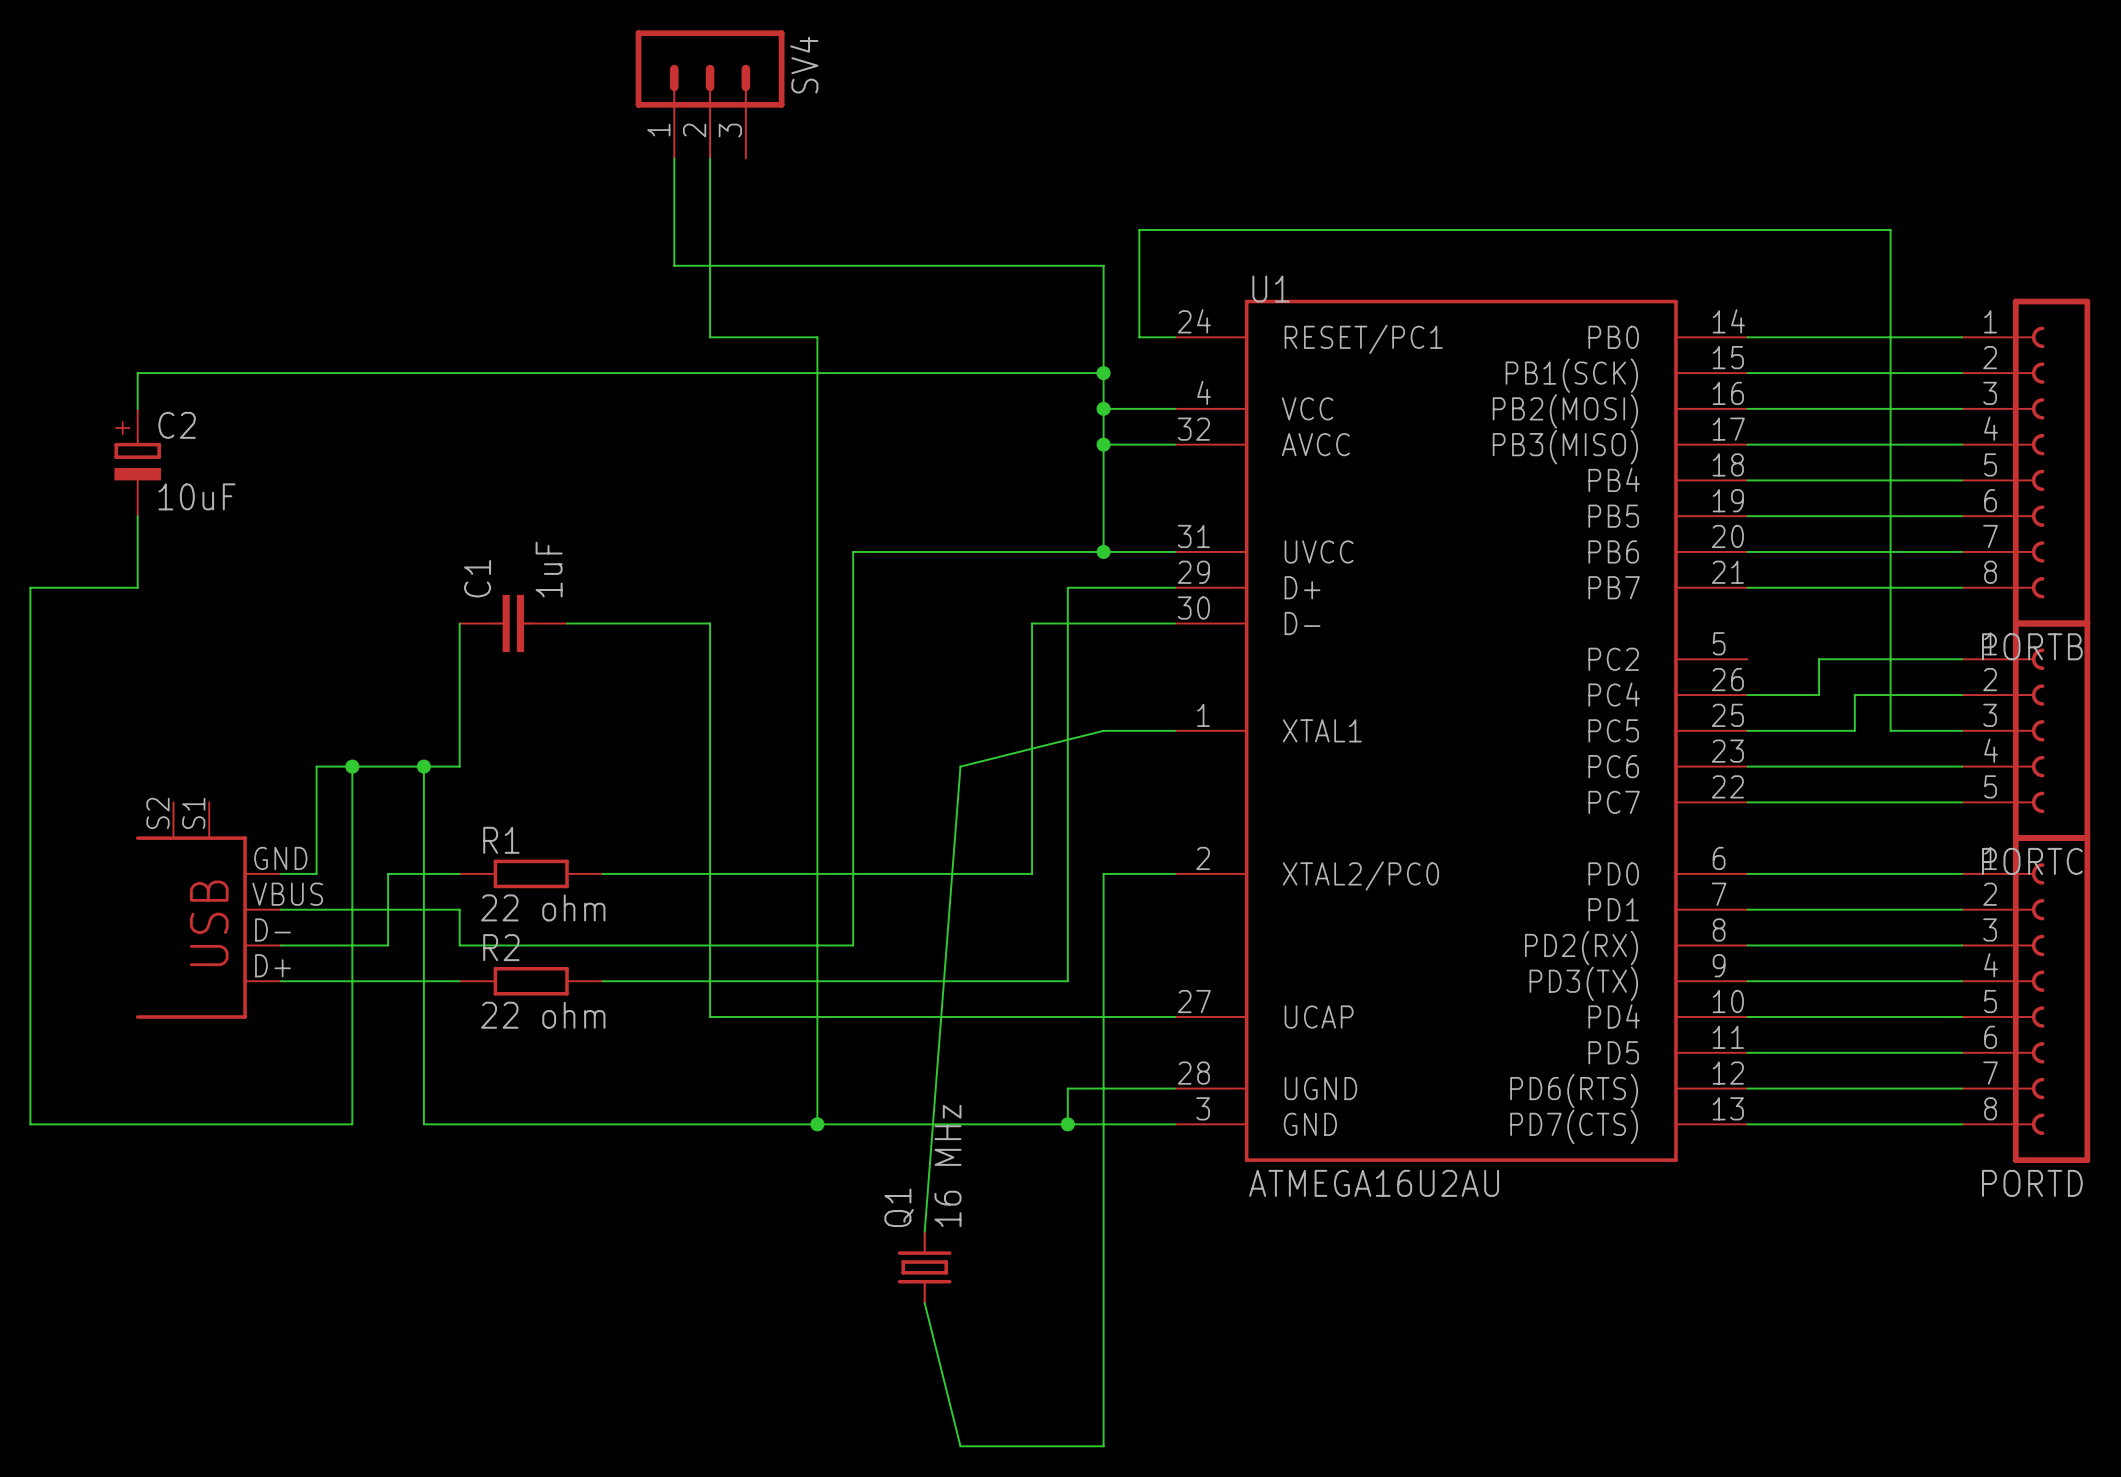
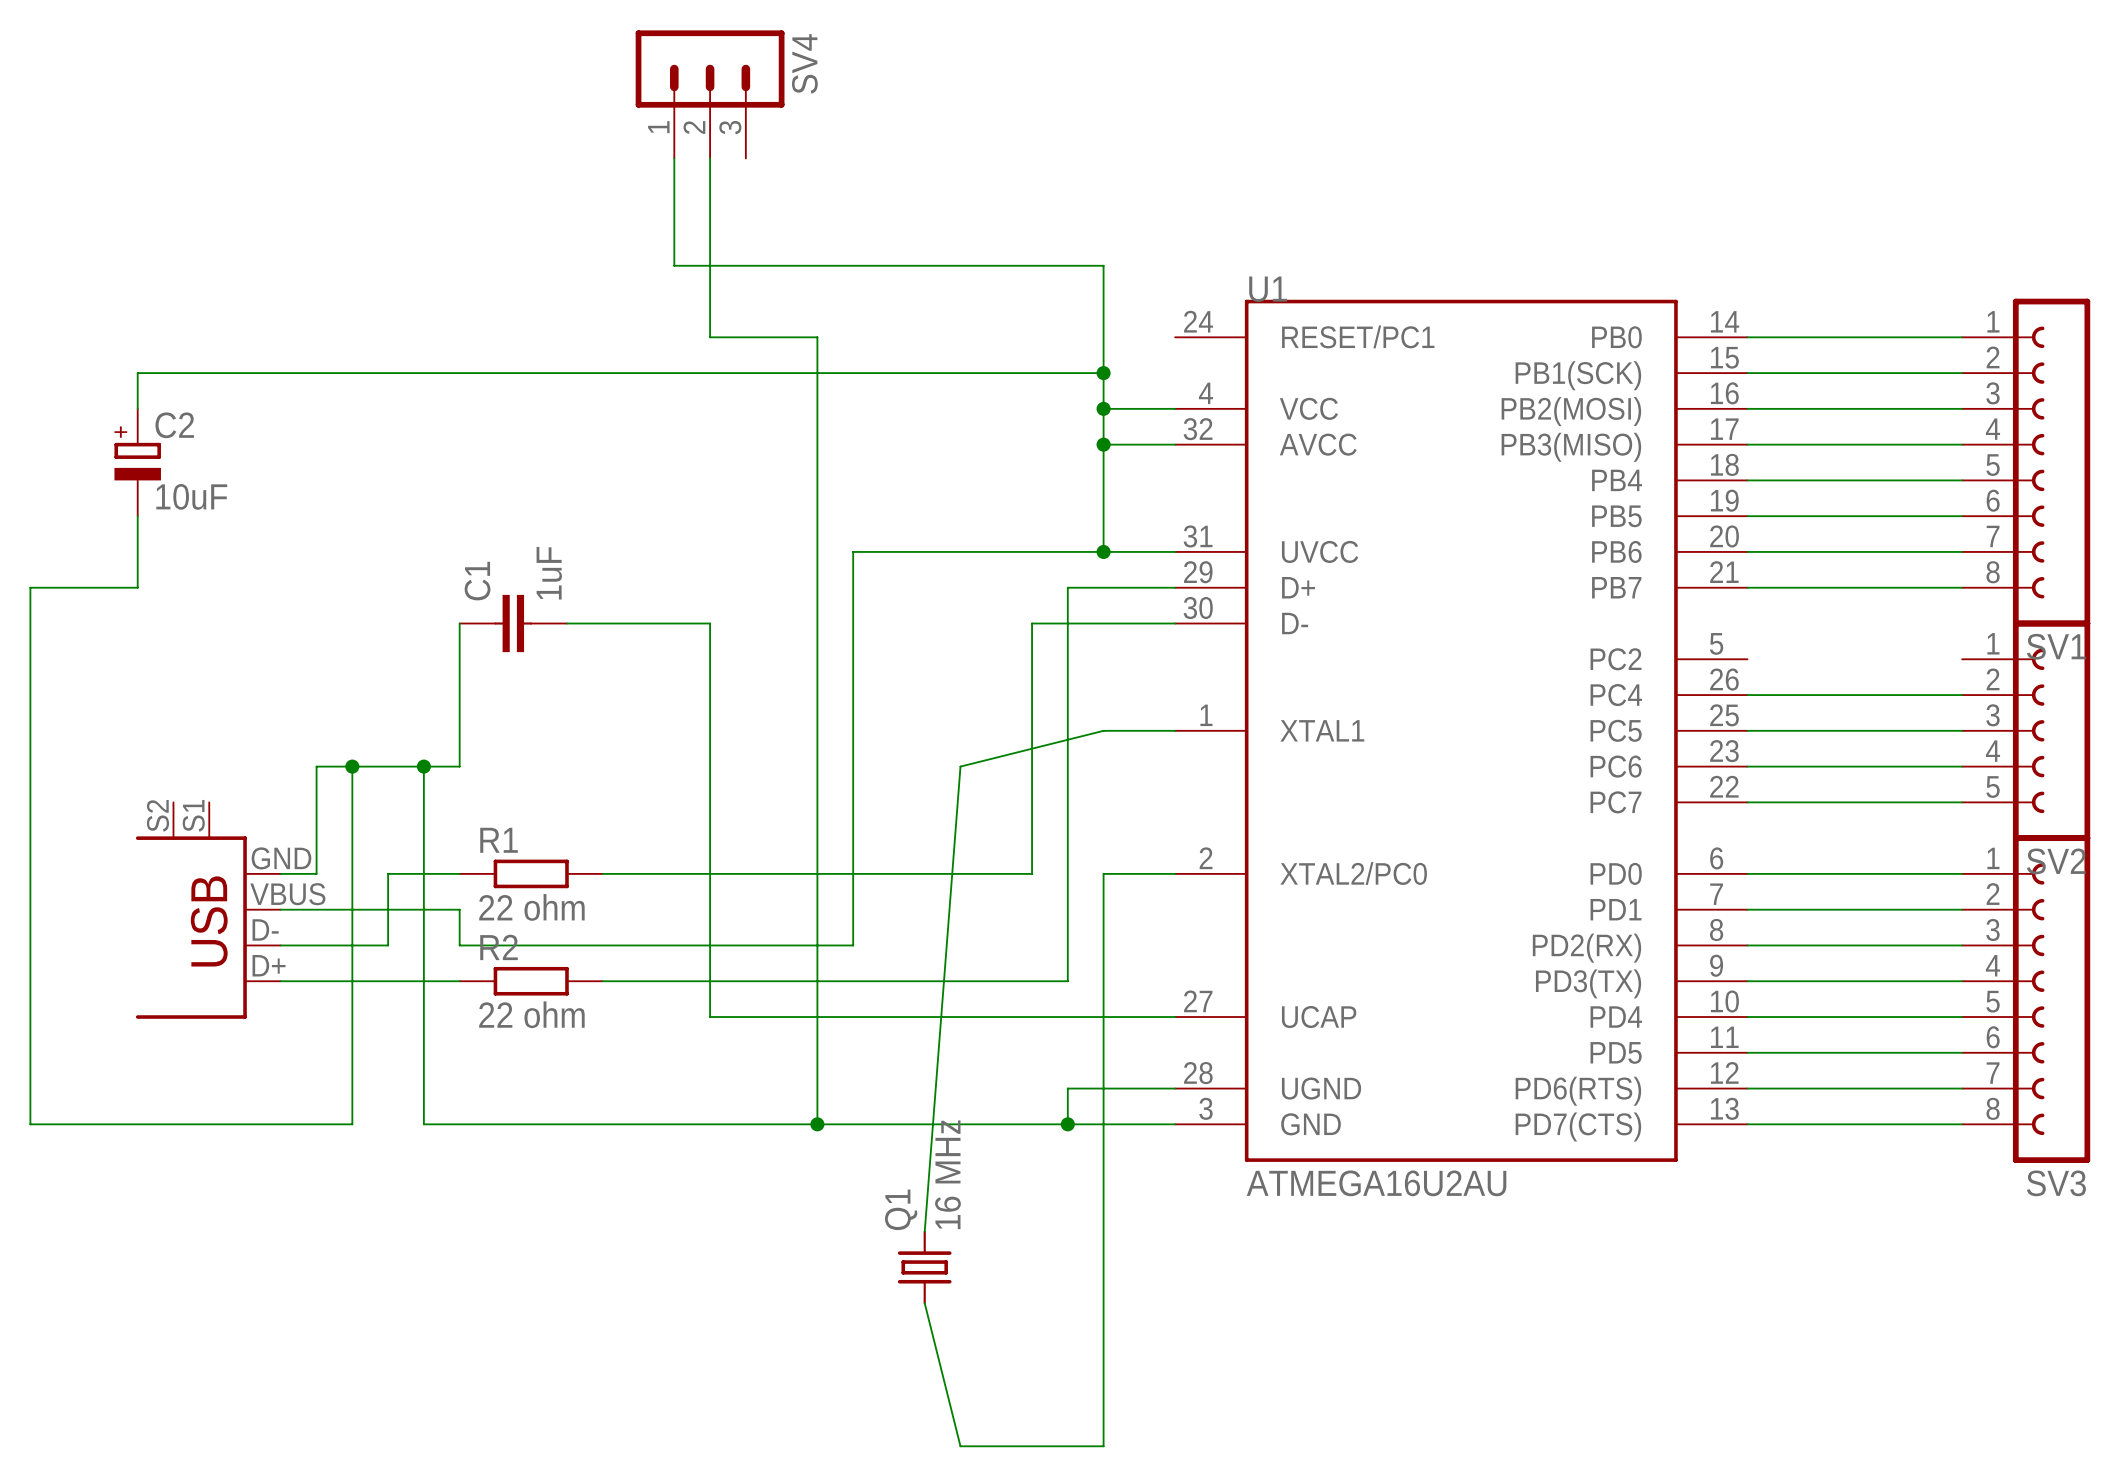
wire: (1175, 337) (1139, 337) (1139, 230) (1890, 230) (1890, 730) -> (1854, 730) (1890, 730)
PORTB name: PORTB (2032, 646) -> SV1 (2056, 646)
wire: (1962, 659) (1819, 659) (1819, 695) -> none
wire: (1854, 695) (1854, 730) -> (1854, 695) (1819, 695)
PORTC name: PORTC (2032, 861) -> SV2 (2056, 861)
PORTD name: PORTD (2032, 1183) -> SV3 (2056, 1183)

